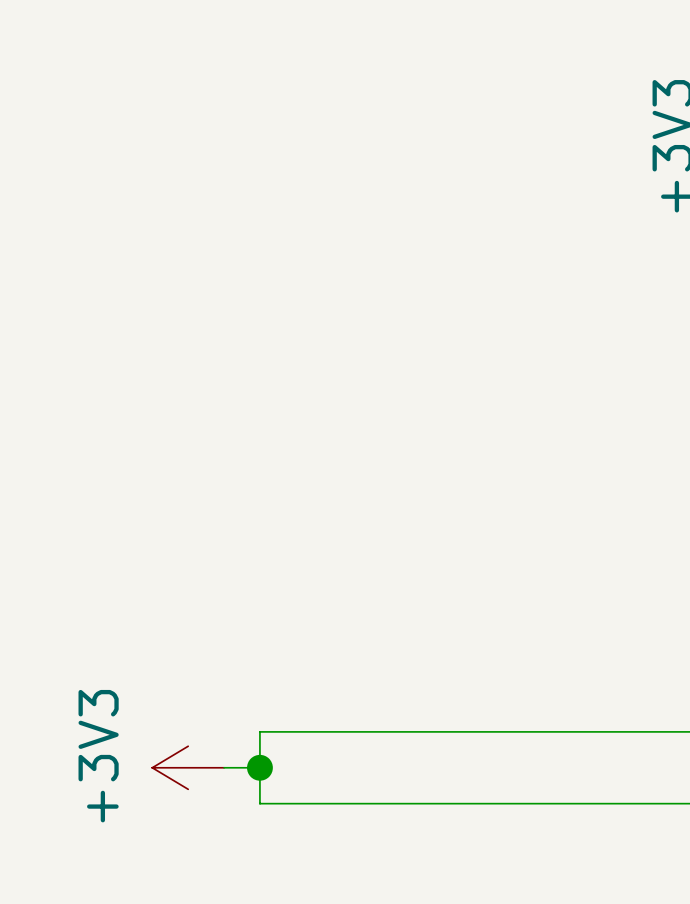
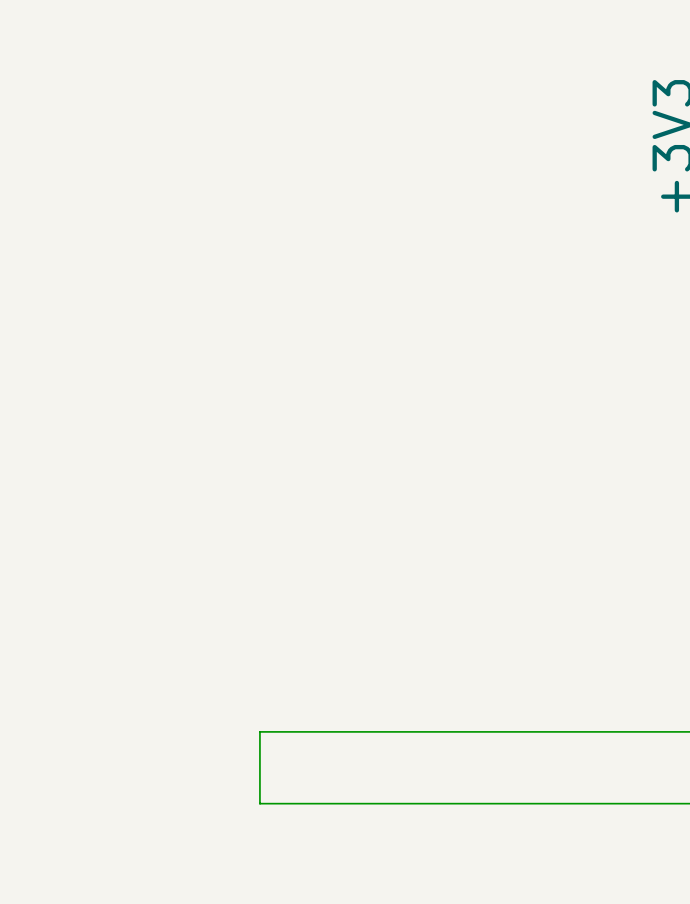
power symbol: +3V3 (188, 767) -> none
wire: (224, 767) (259, 767) -> none
junction: (259, 767) -> none

